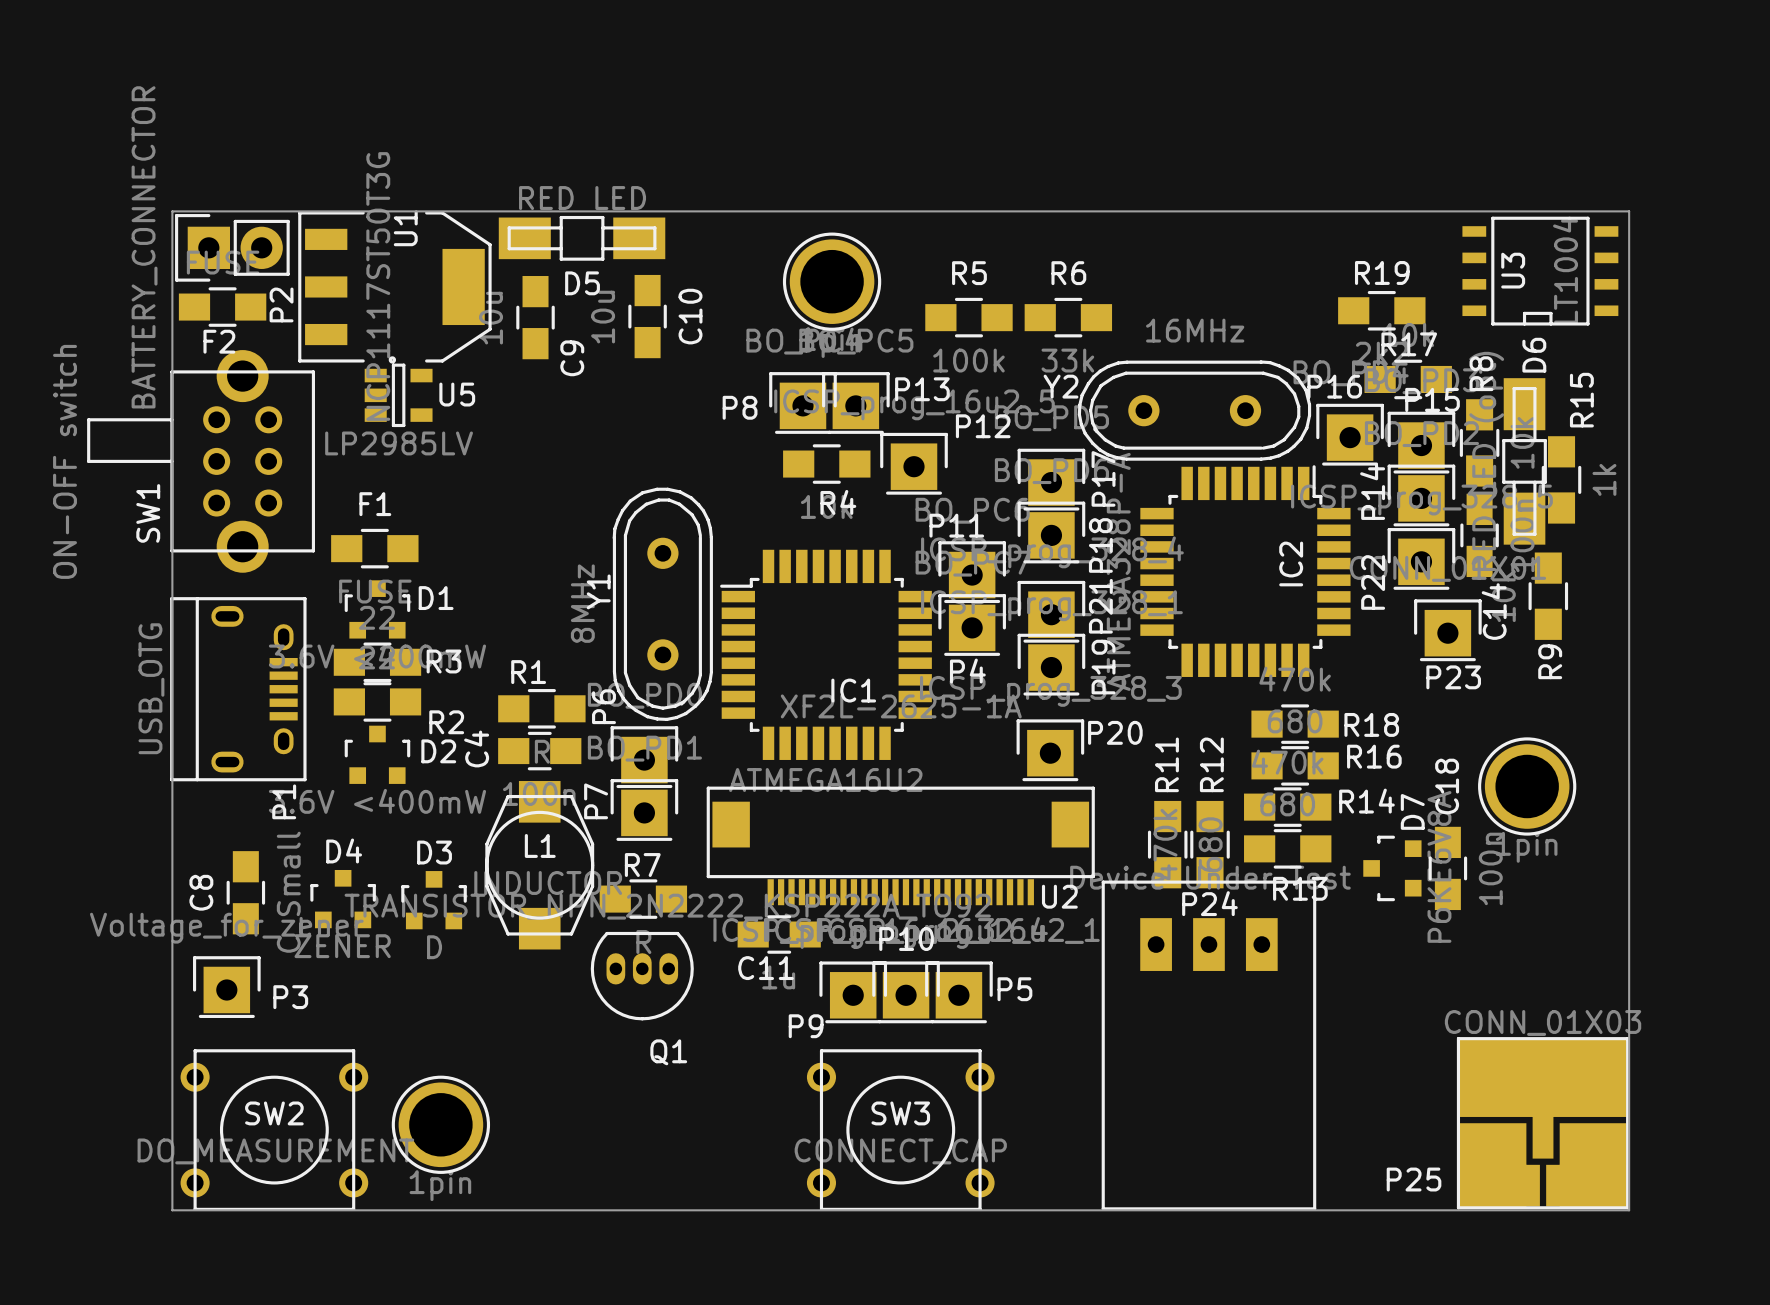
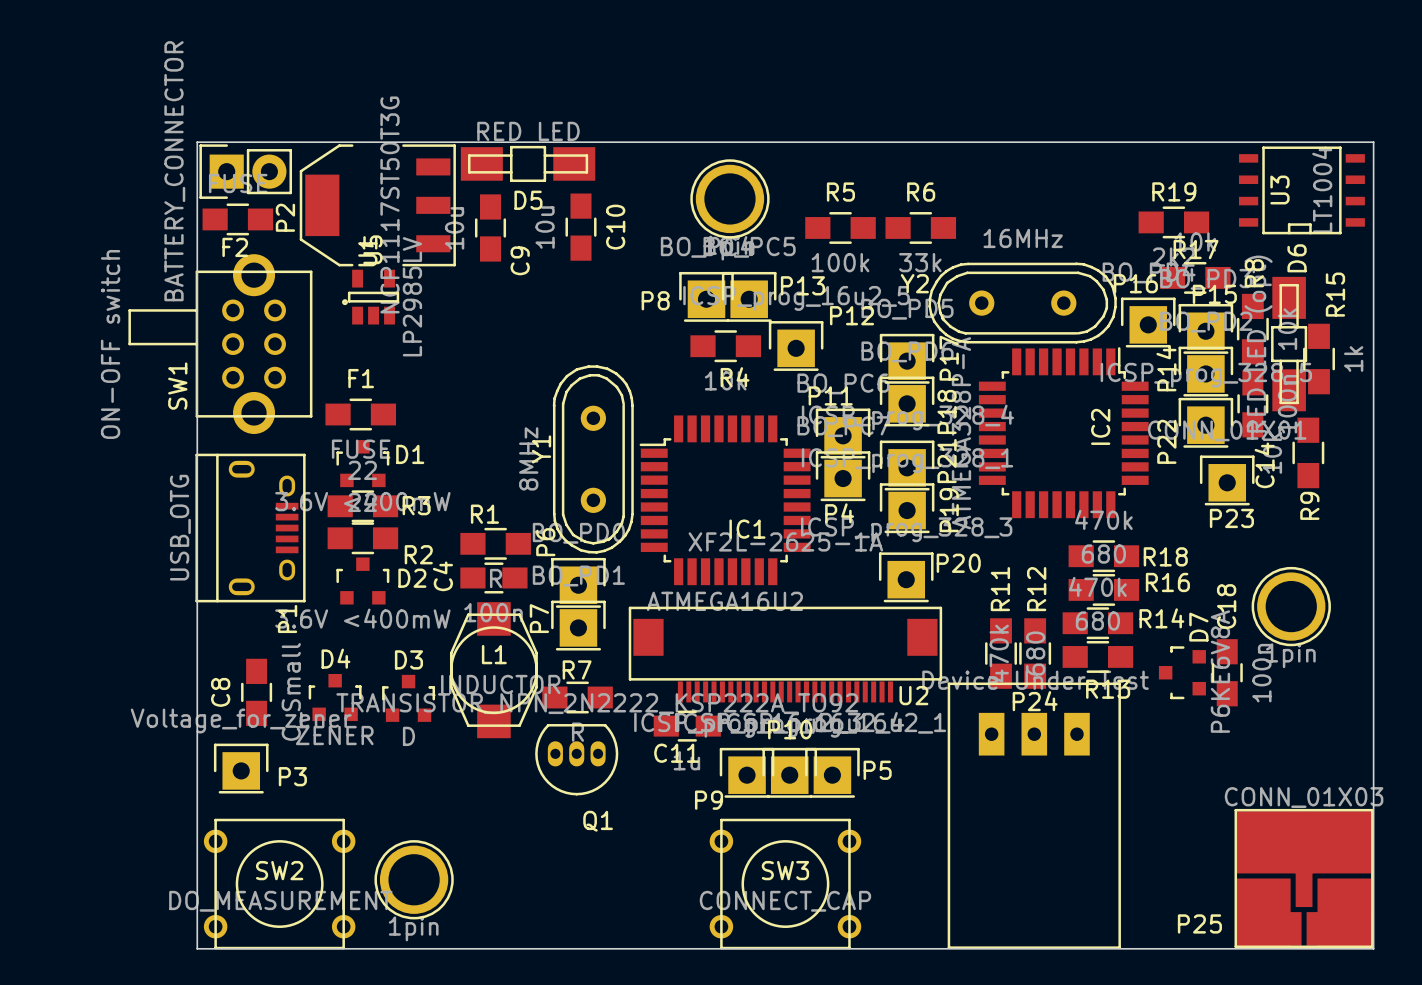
U1 rotation: 0° (394, 286) -> 180° (377, 205)
U5 rotation: 0° (398, 391) -> 90° counterclockwise (370, 297)

